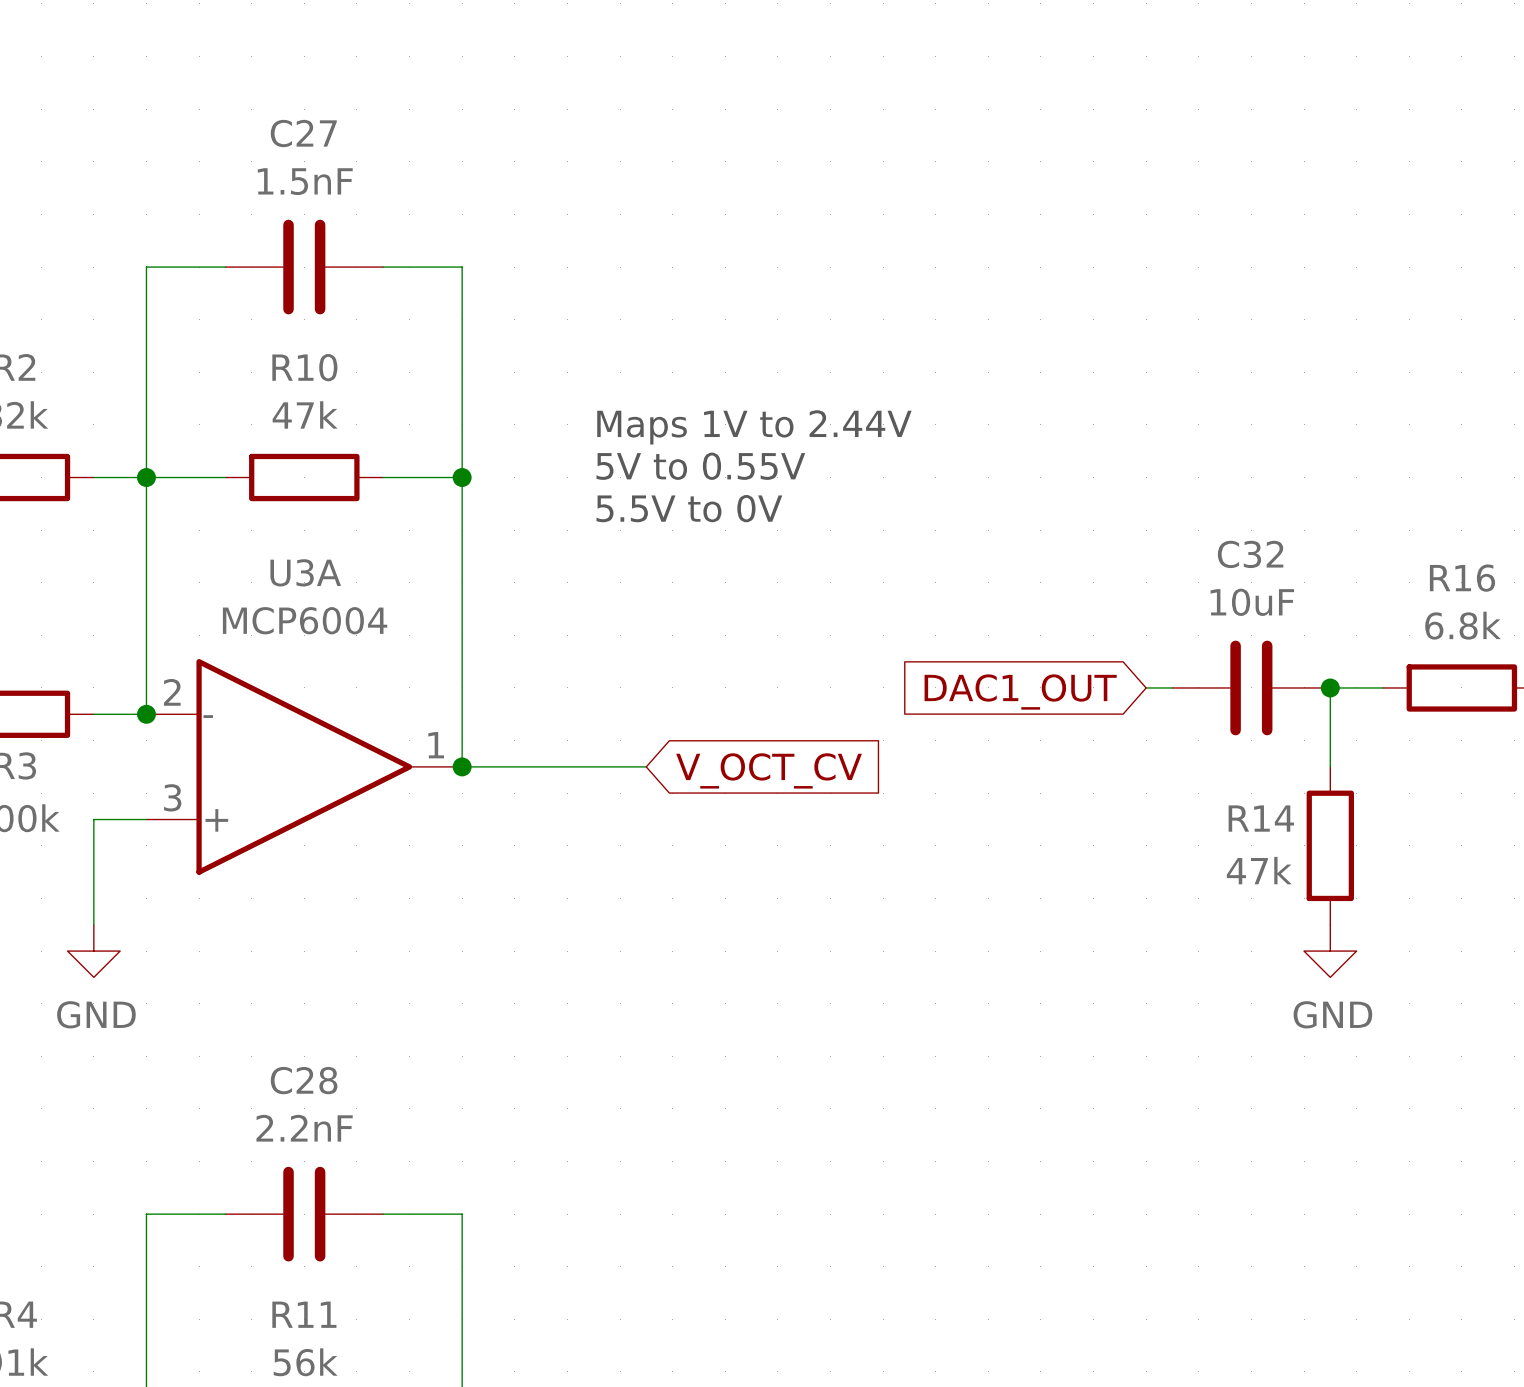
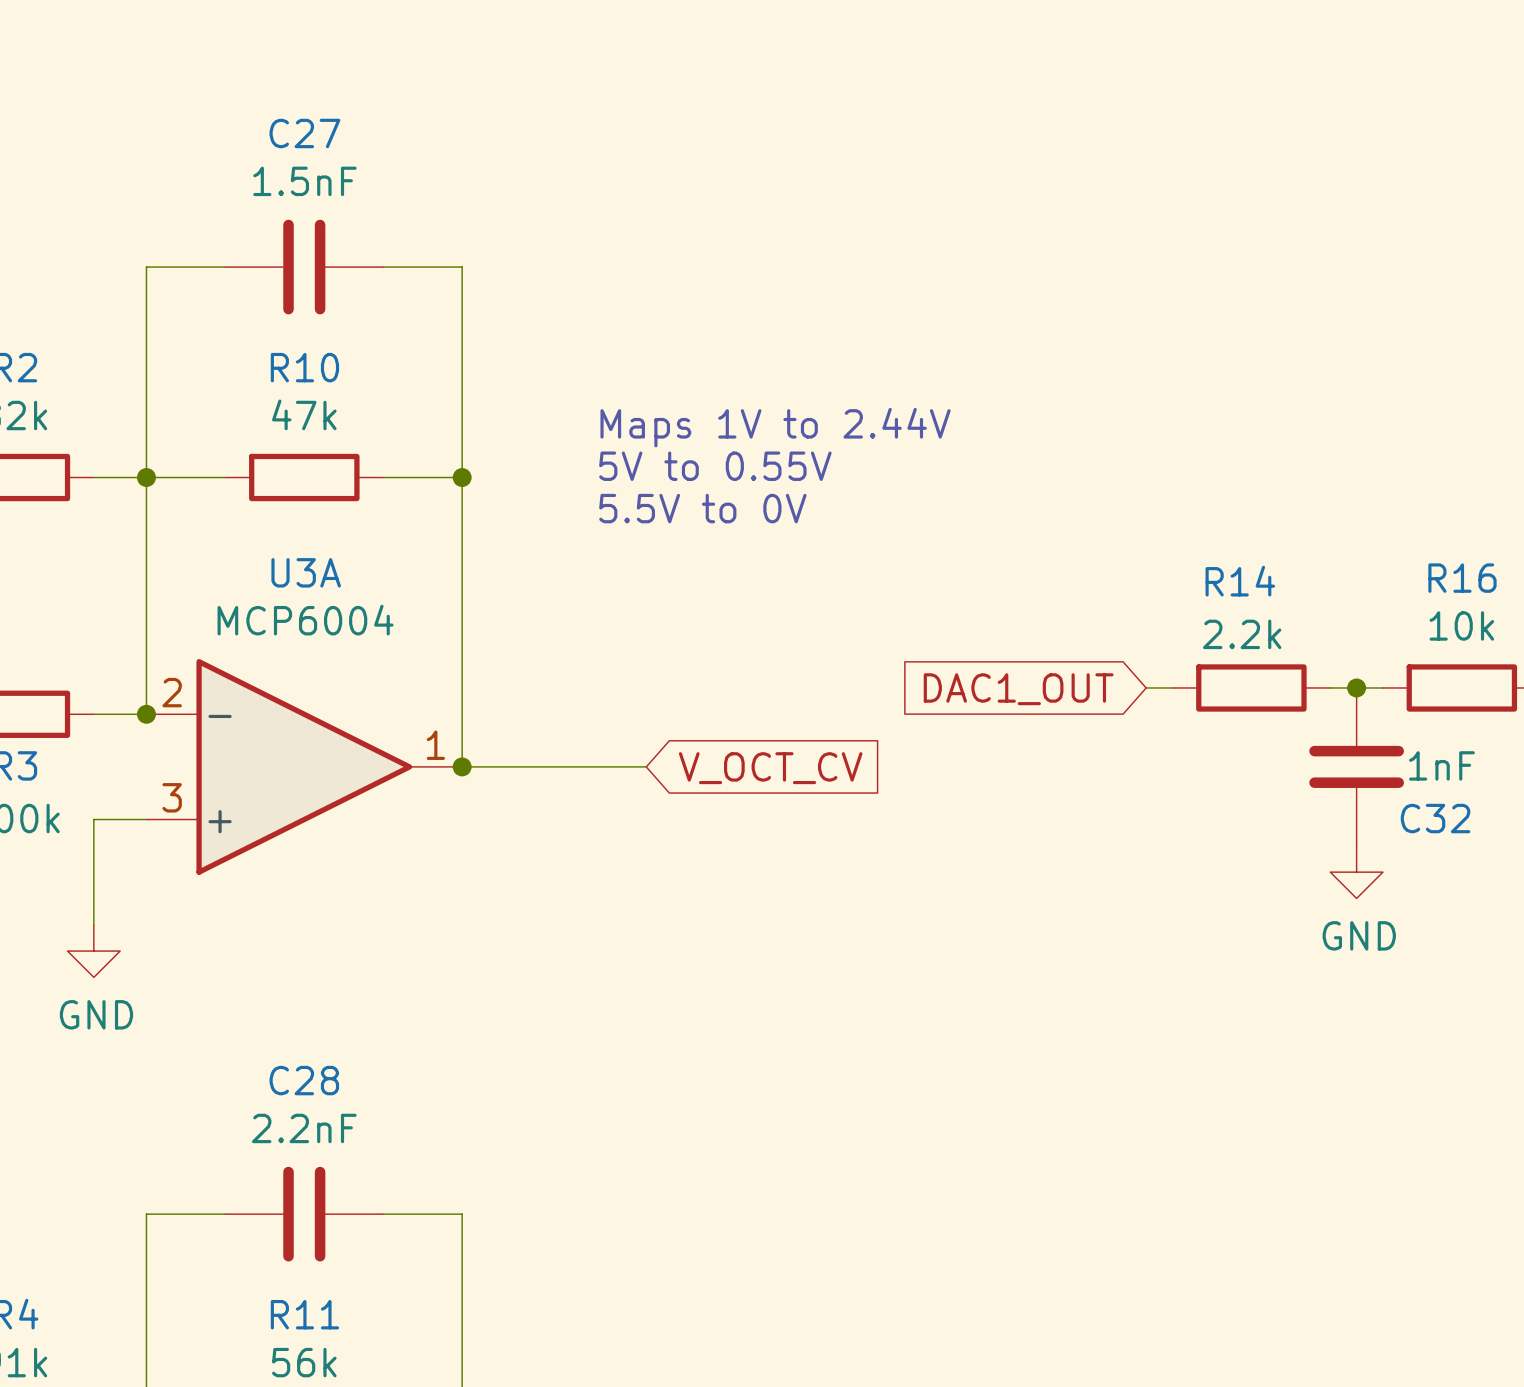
C32 name position: C32 (1250, 554) -> C32 (1435, 818)
C32 value: 10uF (1252, 602) -> 1nF (1441, 765)
R16 value: 6.8k (1463, 625) -> 10k (1461, 625)
C32 rotation: 0° (1251, 687) -> 90° clockwise (1356, 766)
C32 position: (1251, 687) -> (1356, 766)
wire: (1330, 687) (1330, 766) -> none
junction position: (1330, 687) -> (1356, 687)
R14 name position: R14 (1261, 818) -> R14 (1240, 581)
R14 rotation: 0° (1330, 845) -> 90° clockwise (1251, 687)
R14 position: (1330, 845) -> (1251, 687)
R14 value: 47k (1259, 870) -> 2.2k (1242, 634)
power symbol position: GND (1330, 951) -> GND (1356, 872)

